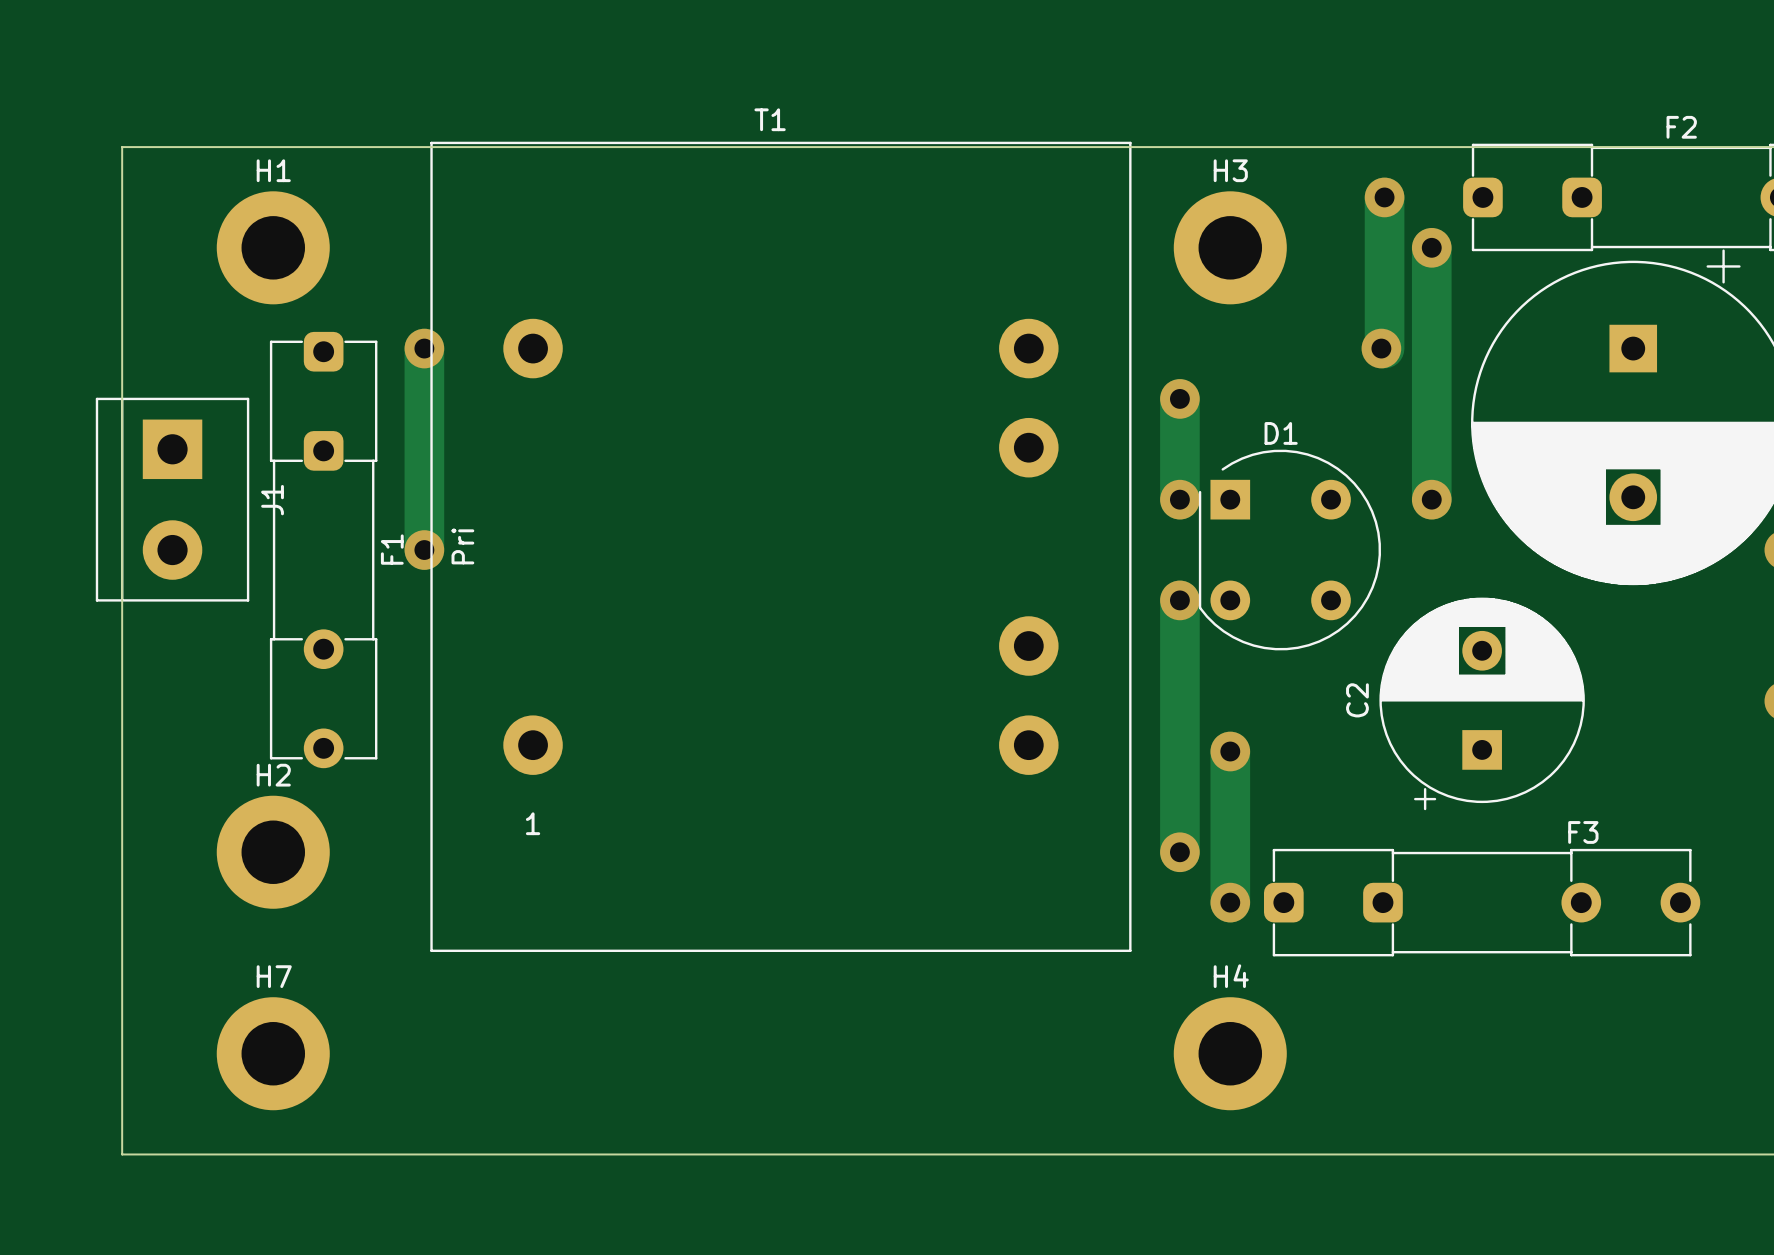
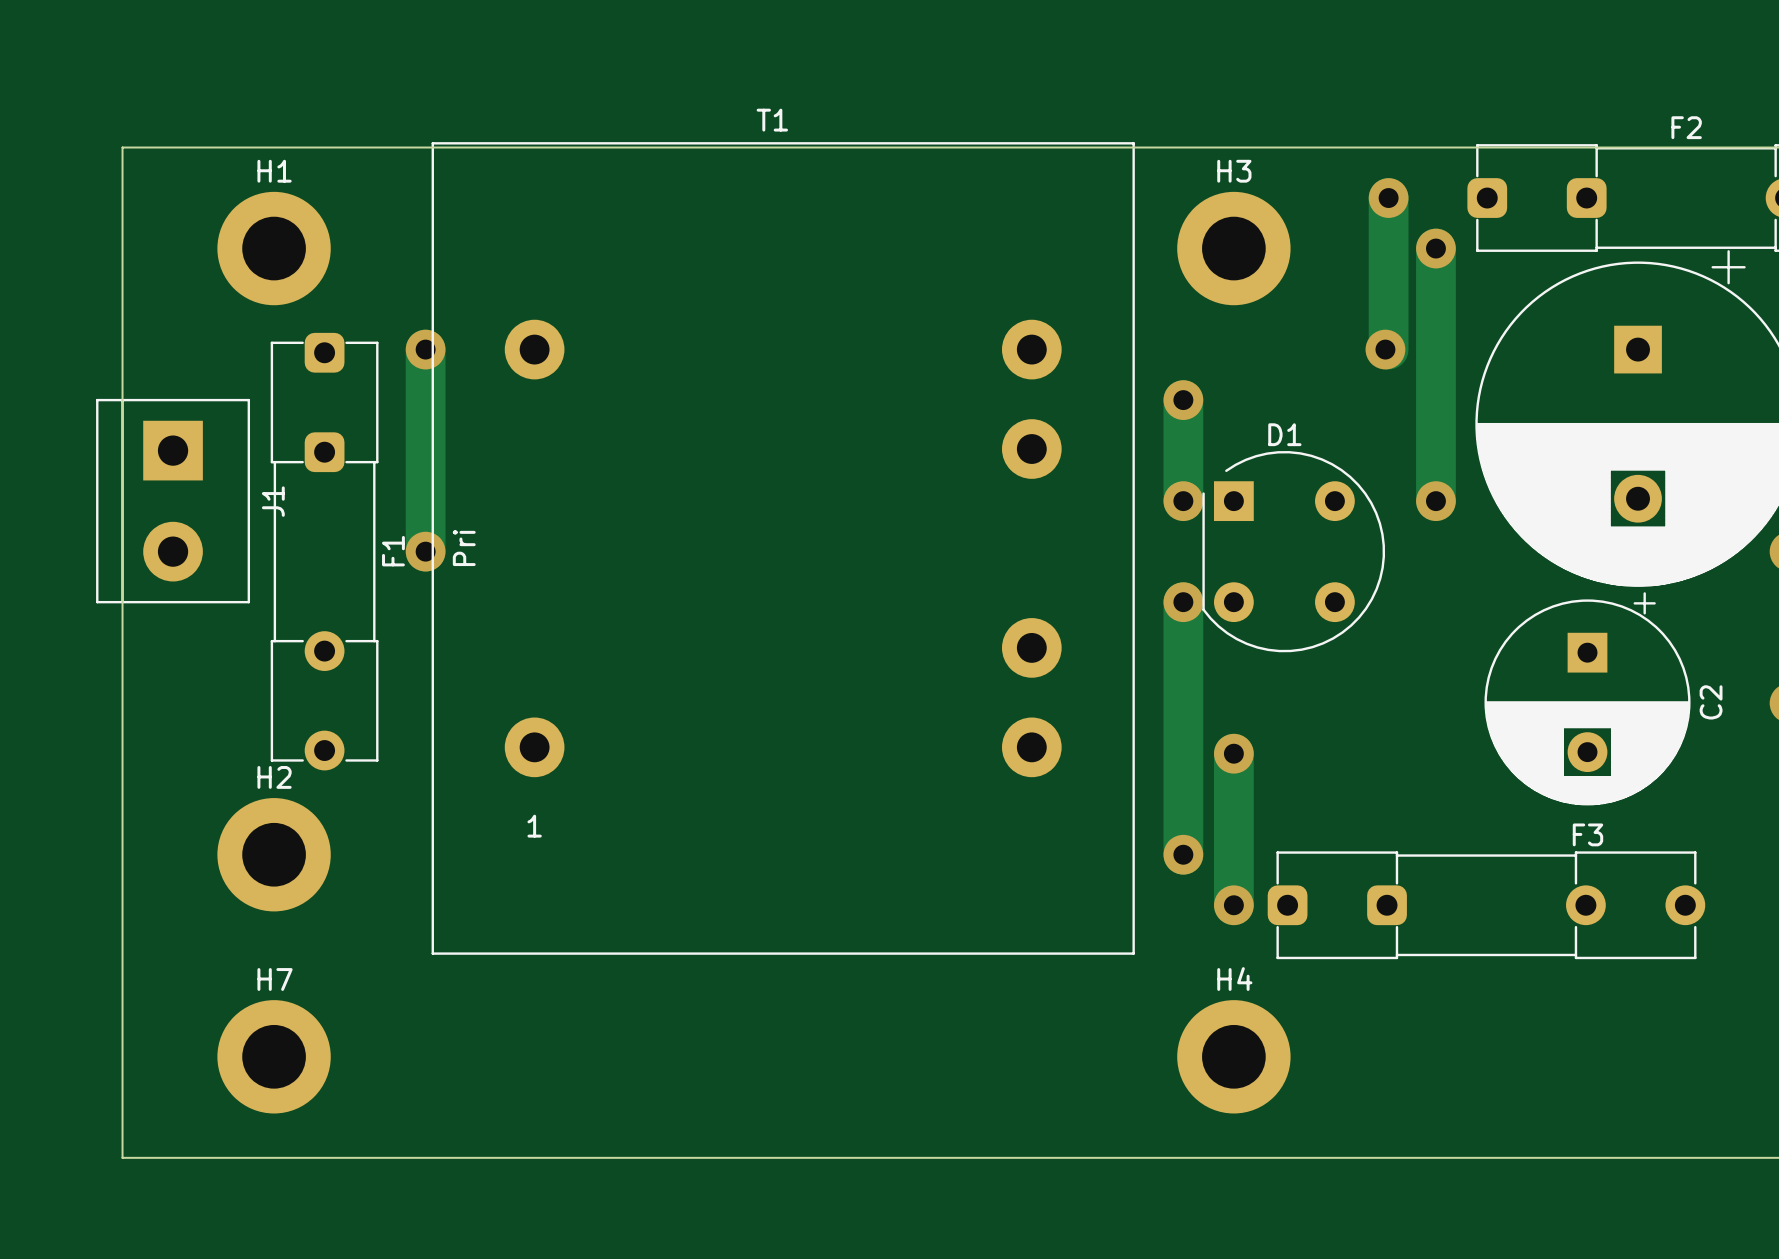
C2 rotation: 0° (1482, 703) -> 180° (1587, 698)

